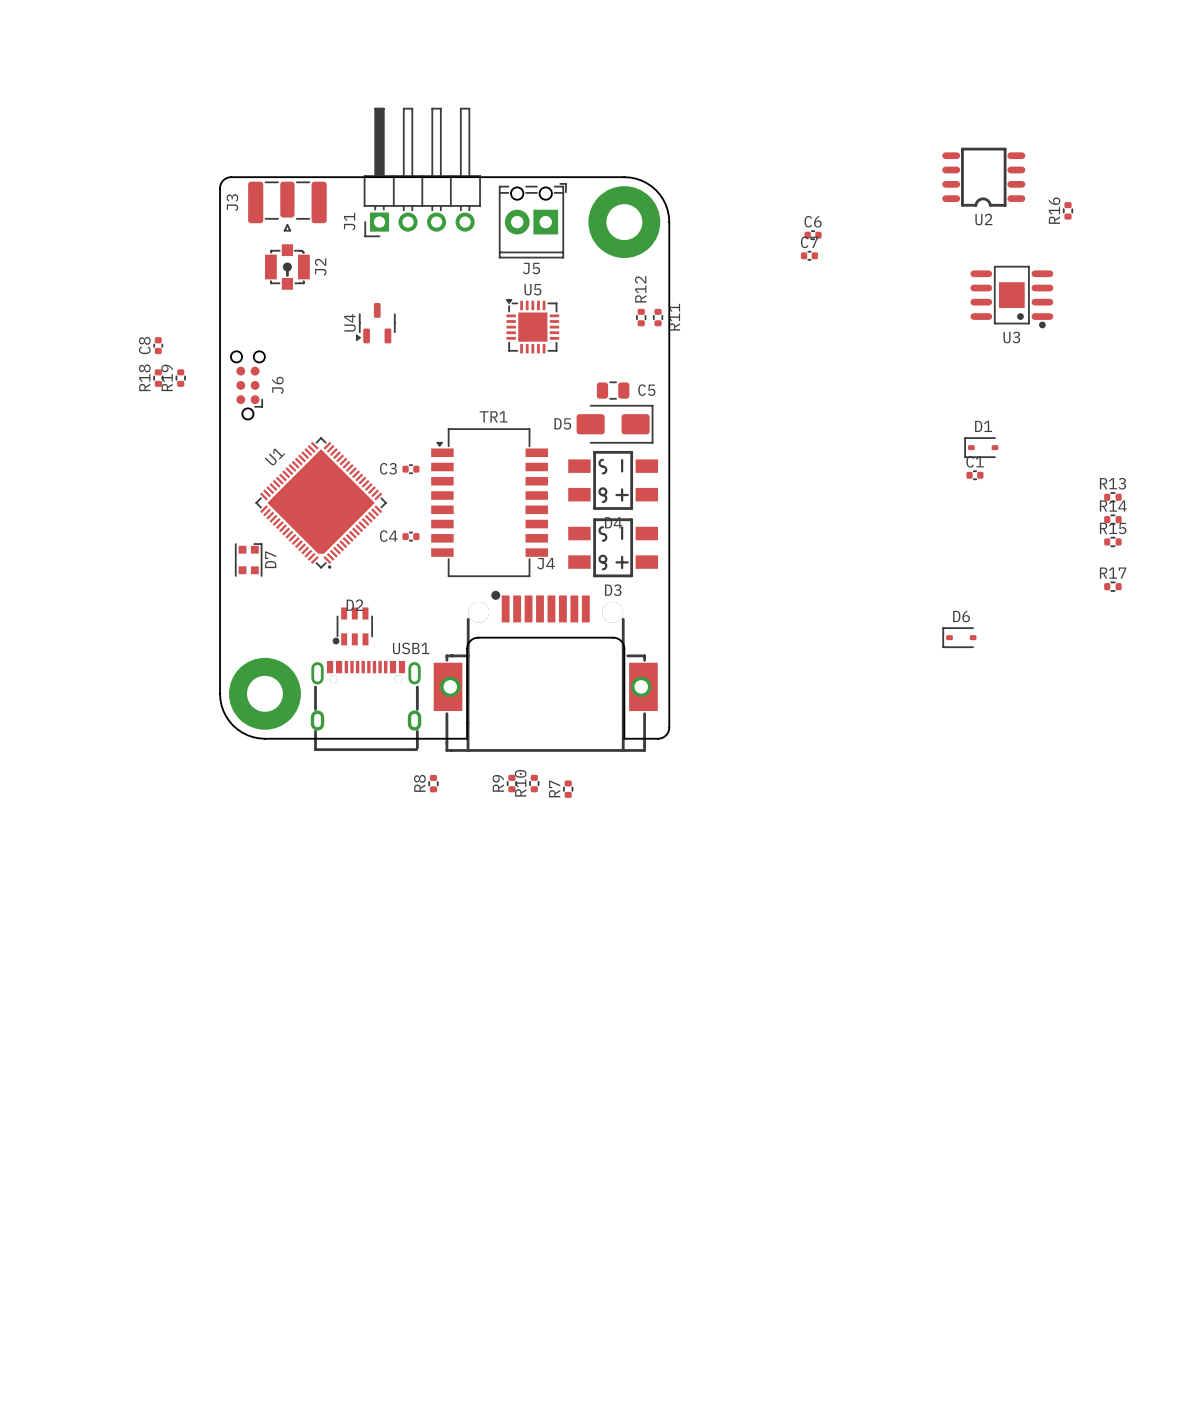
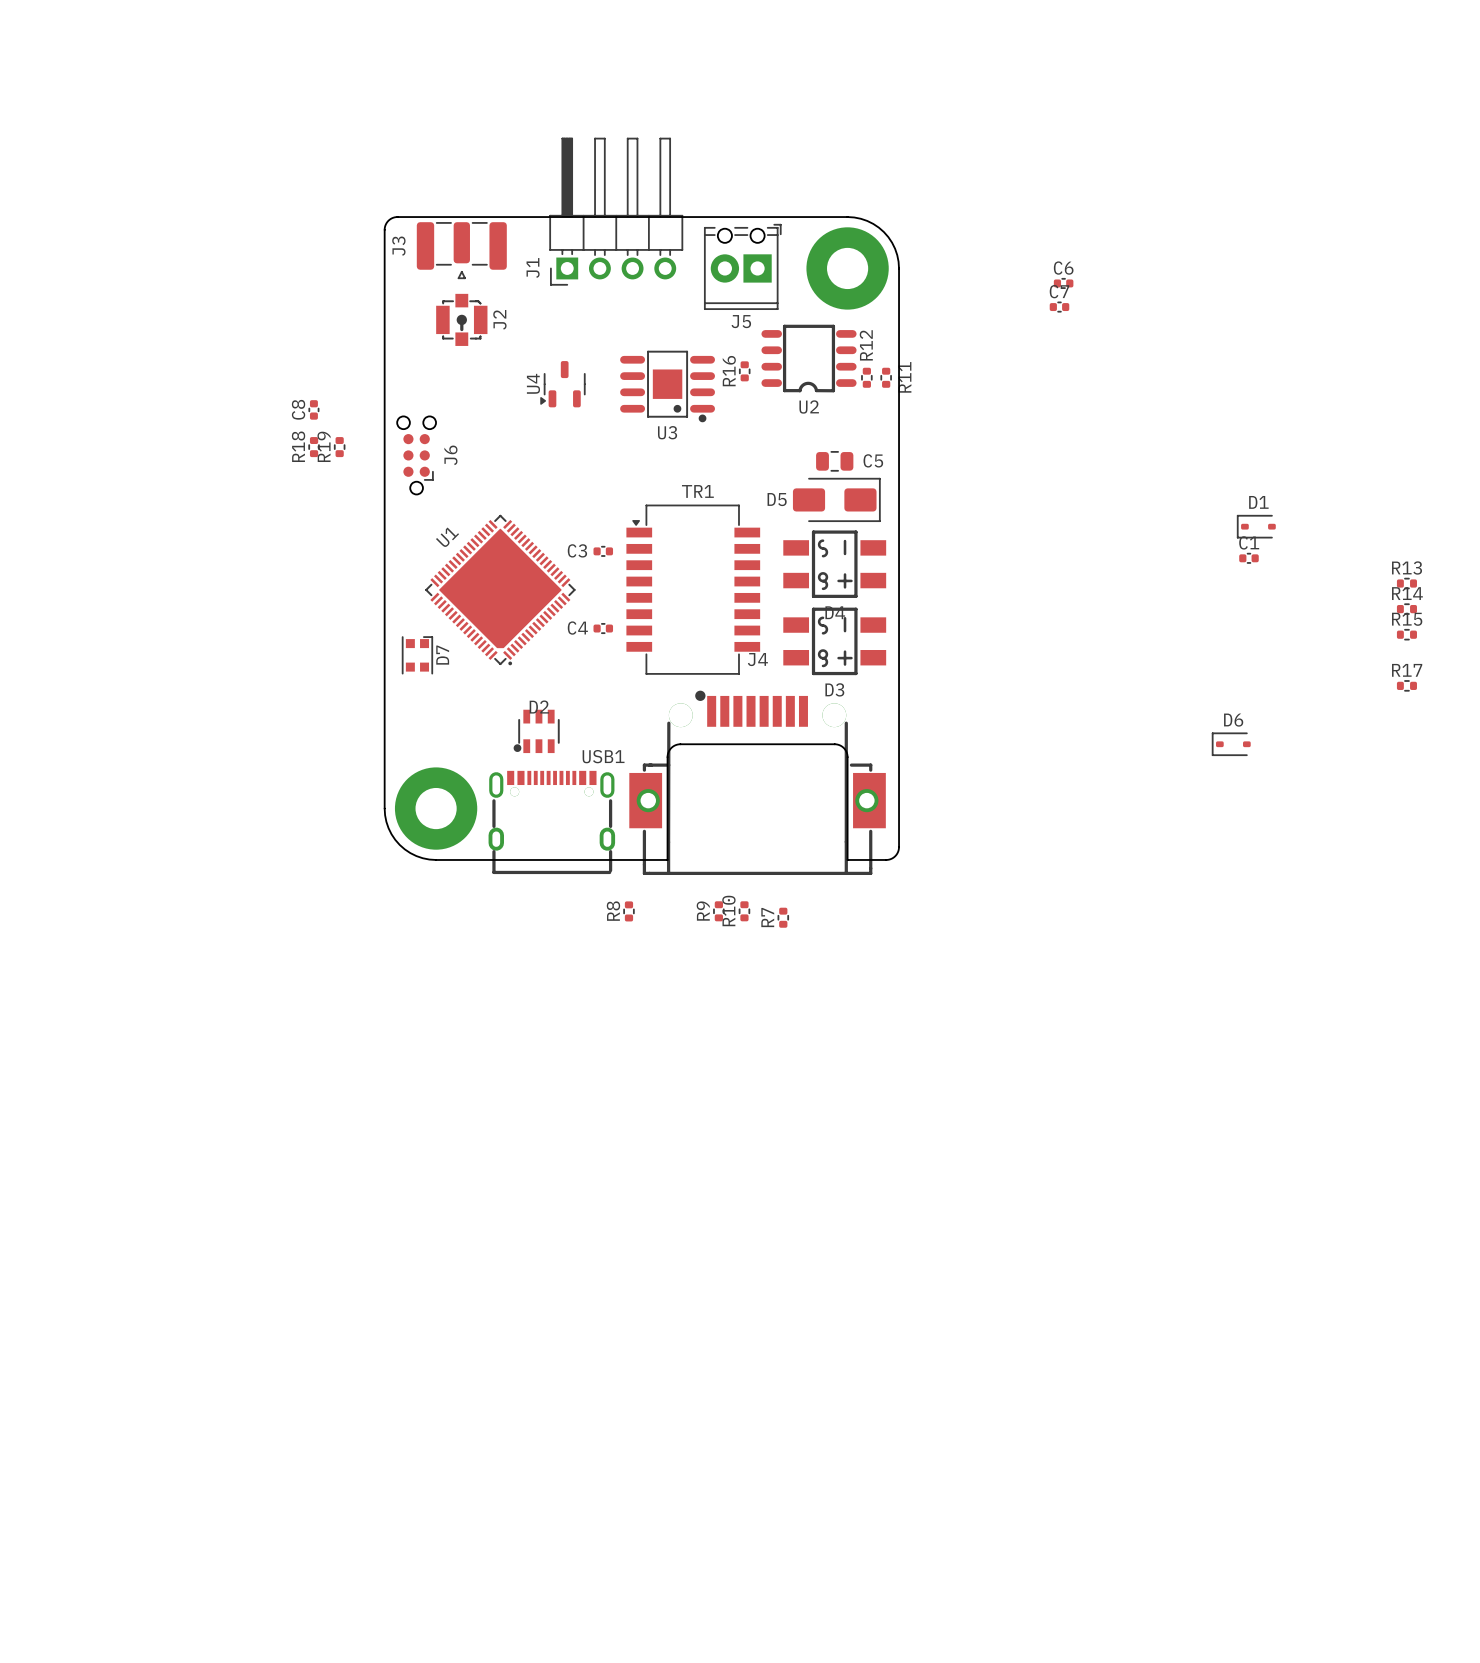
U2 position: (983, 178) -> (809, 359)
R16 position: (1068, 210) -> (744, 371)
U3 position: (1011, 297) -> (667, 386)
U5: (532, 326) -> none

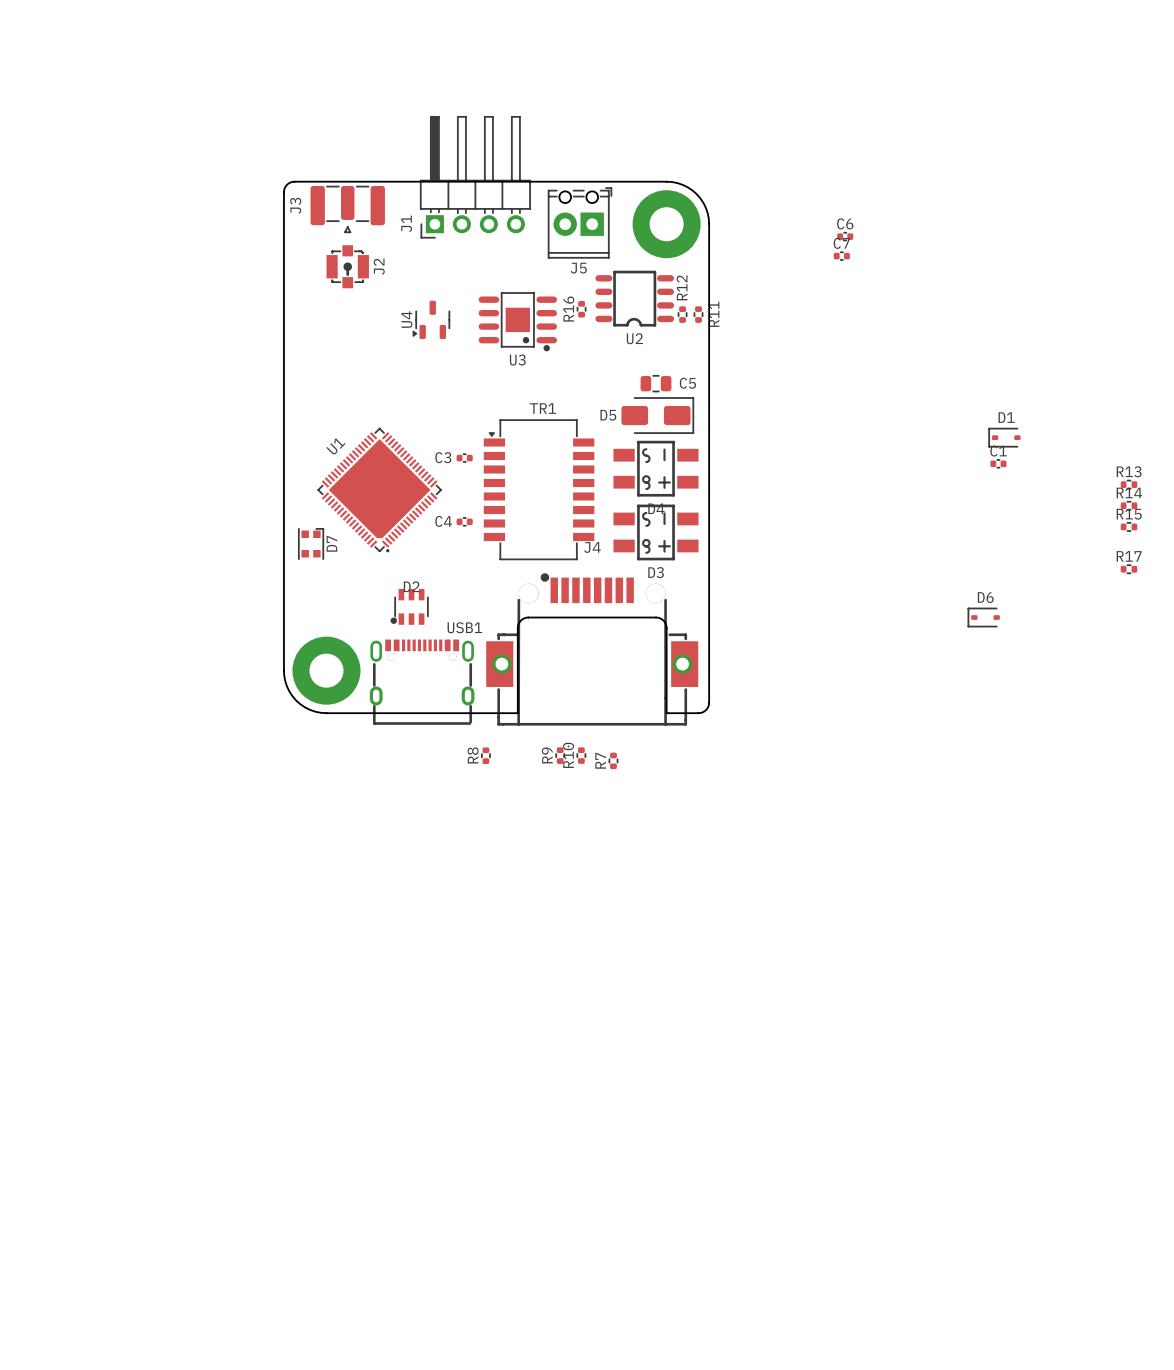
C8: (313, 409) -> none
R18: (314, 447) -> none
R19: (339, 447) -> none
J6: (416, 455) -> none

